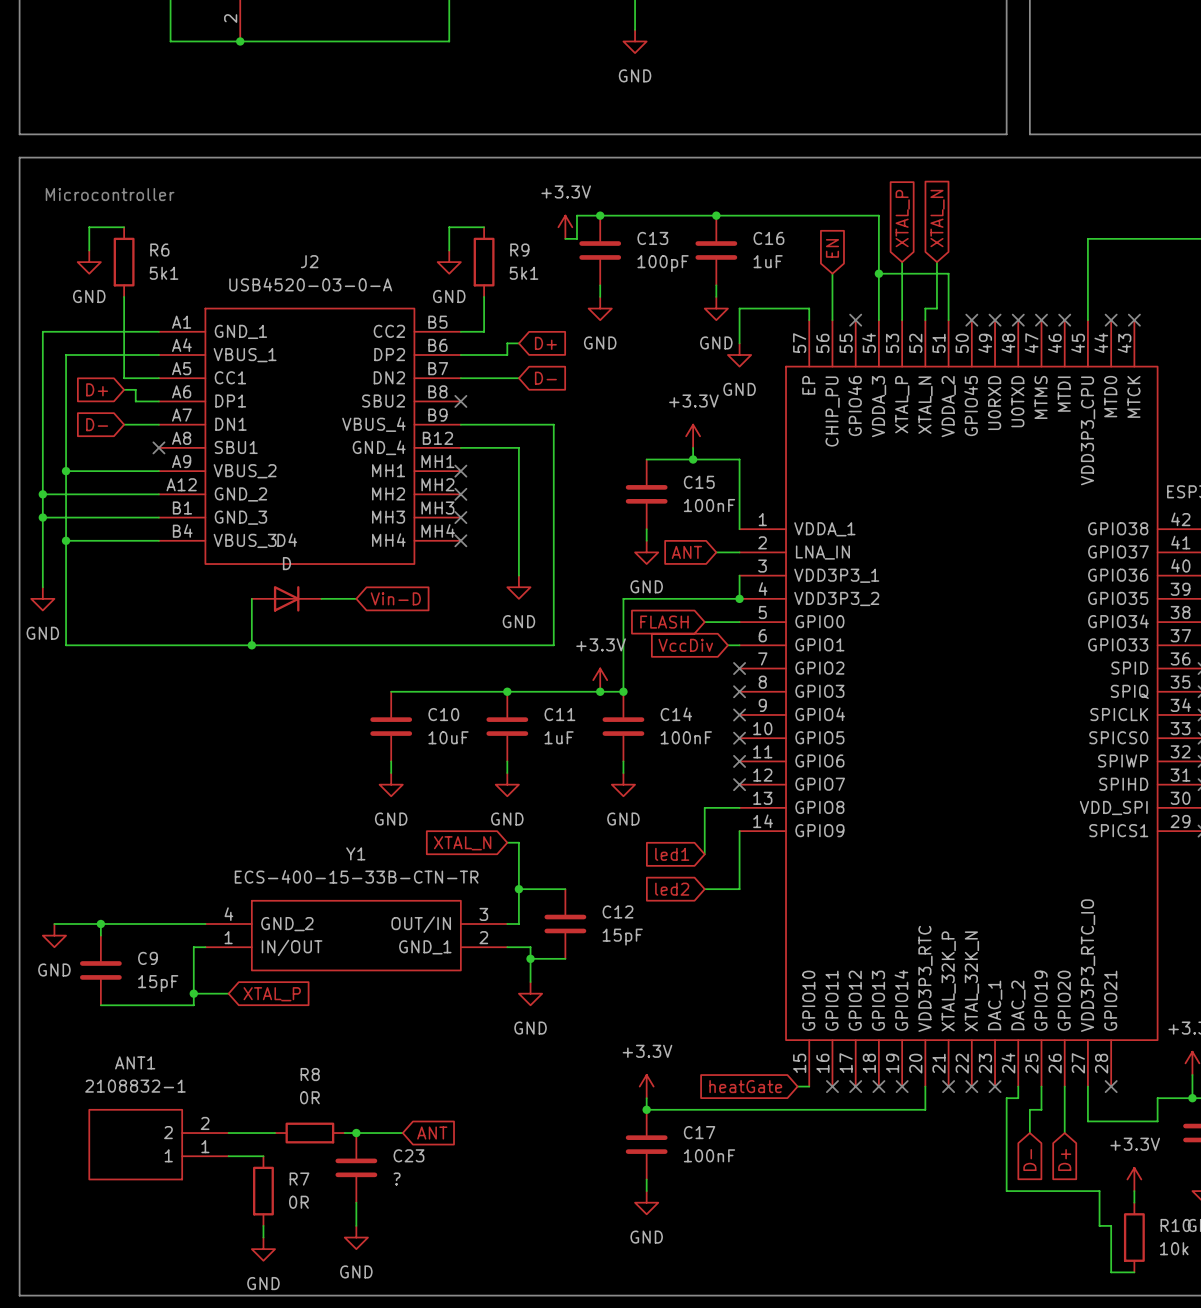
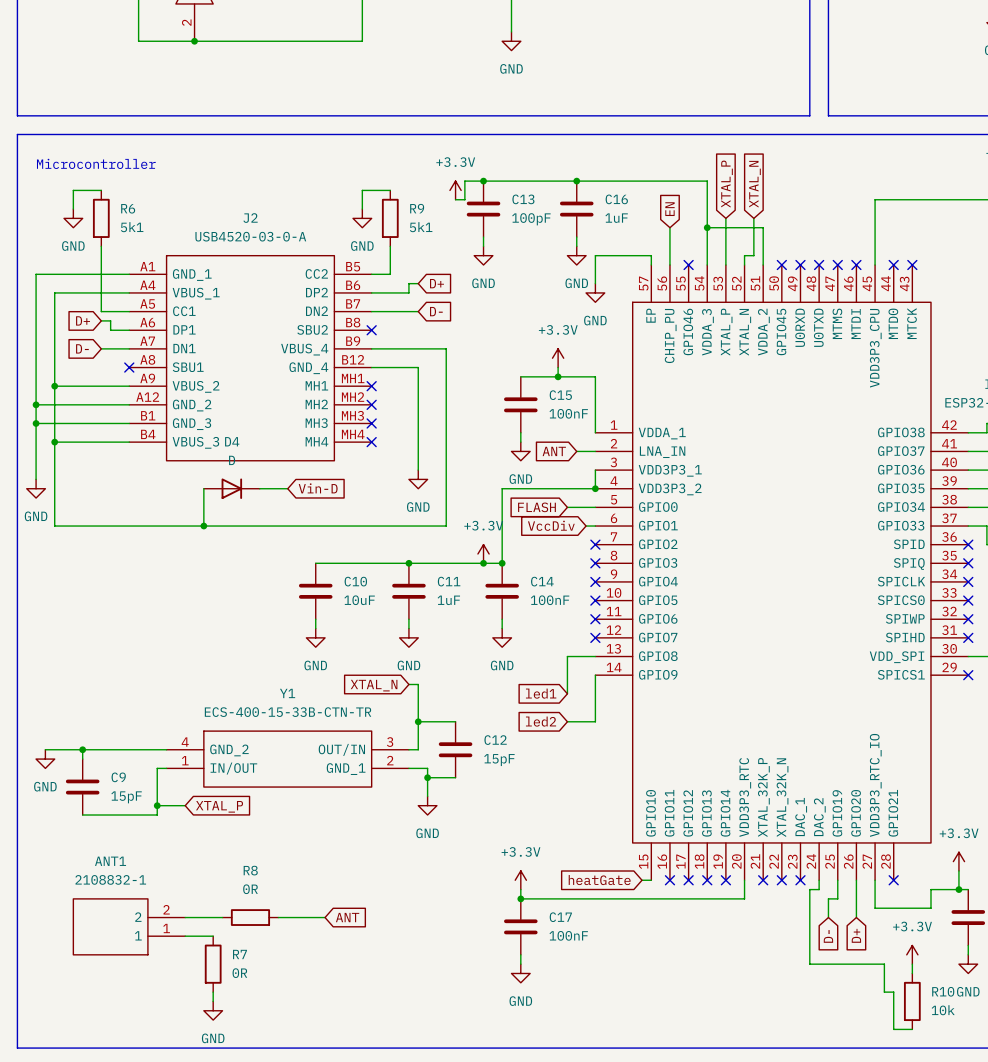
junction: (356, 1133) -> none
C23: ? (356, 1167) -> none
wire: (356, 1202) (356, 1225) -> none
power symbol: GND (356, 1237) -> none

